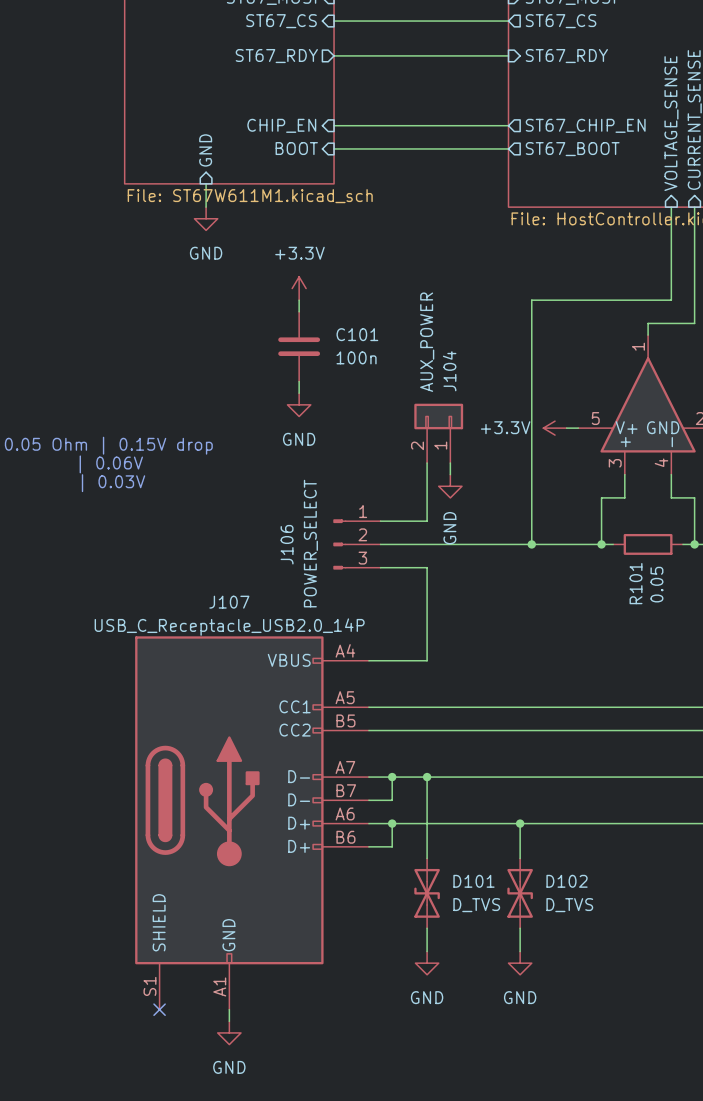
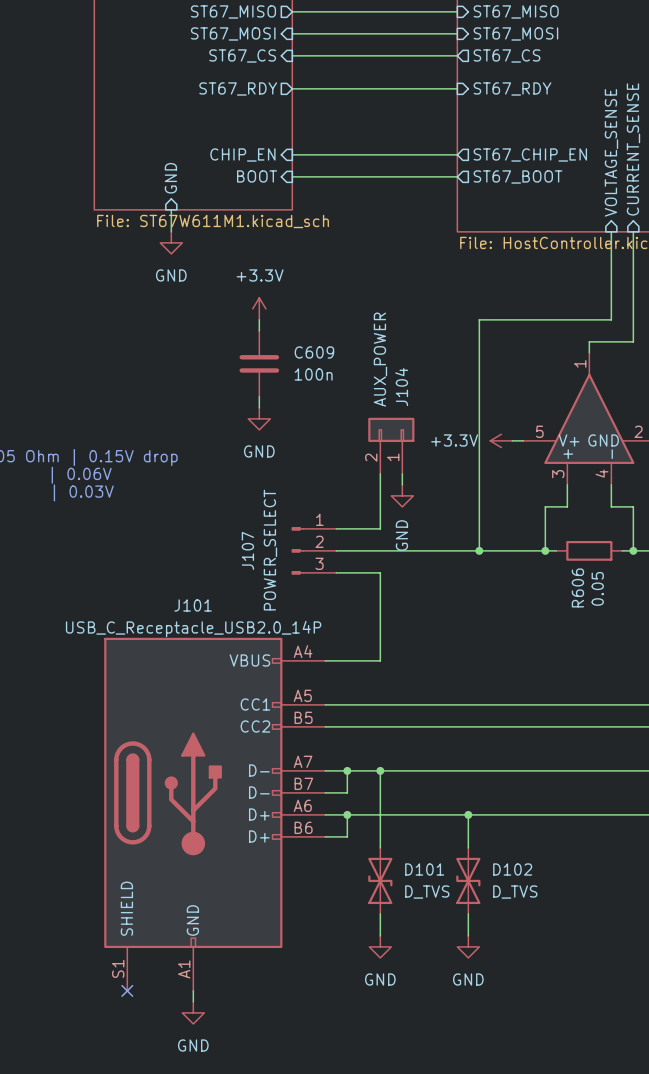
C101 name: C101 (357, 334) -> C609 (314, 352)
J106 name: J106 (287, 544) -> J107 (247, 550)
R101 name: R101 (636, 583) -> R606 (577, 587)
J107 name: J107 (229, 602) -> J101 (193, 605)

